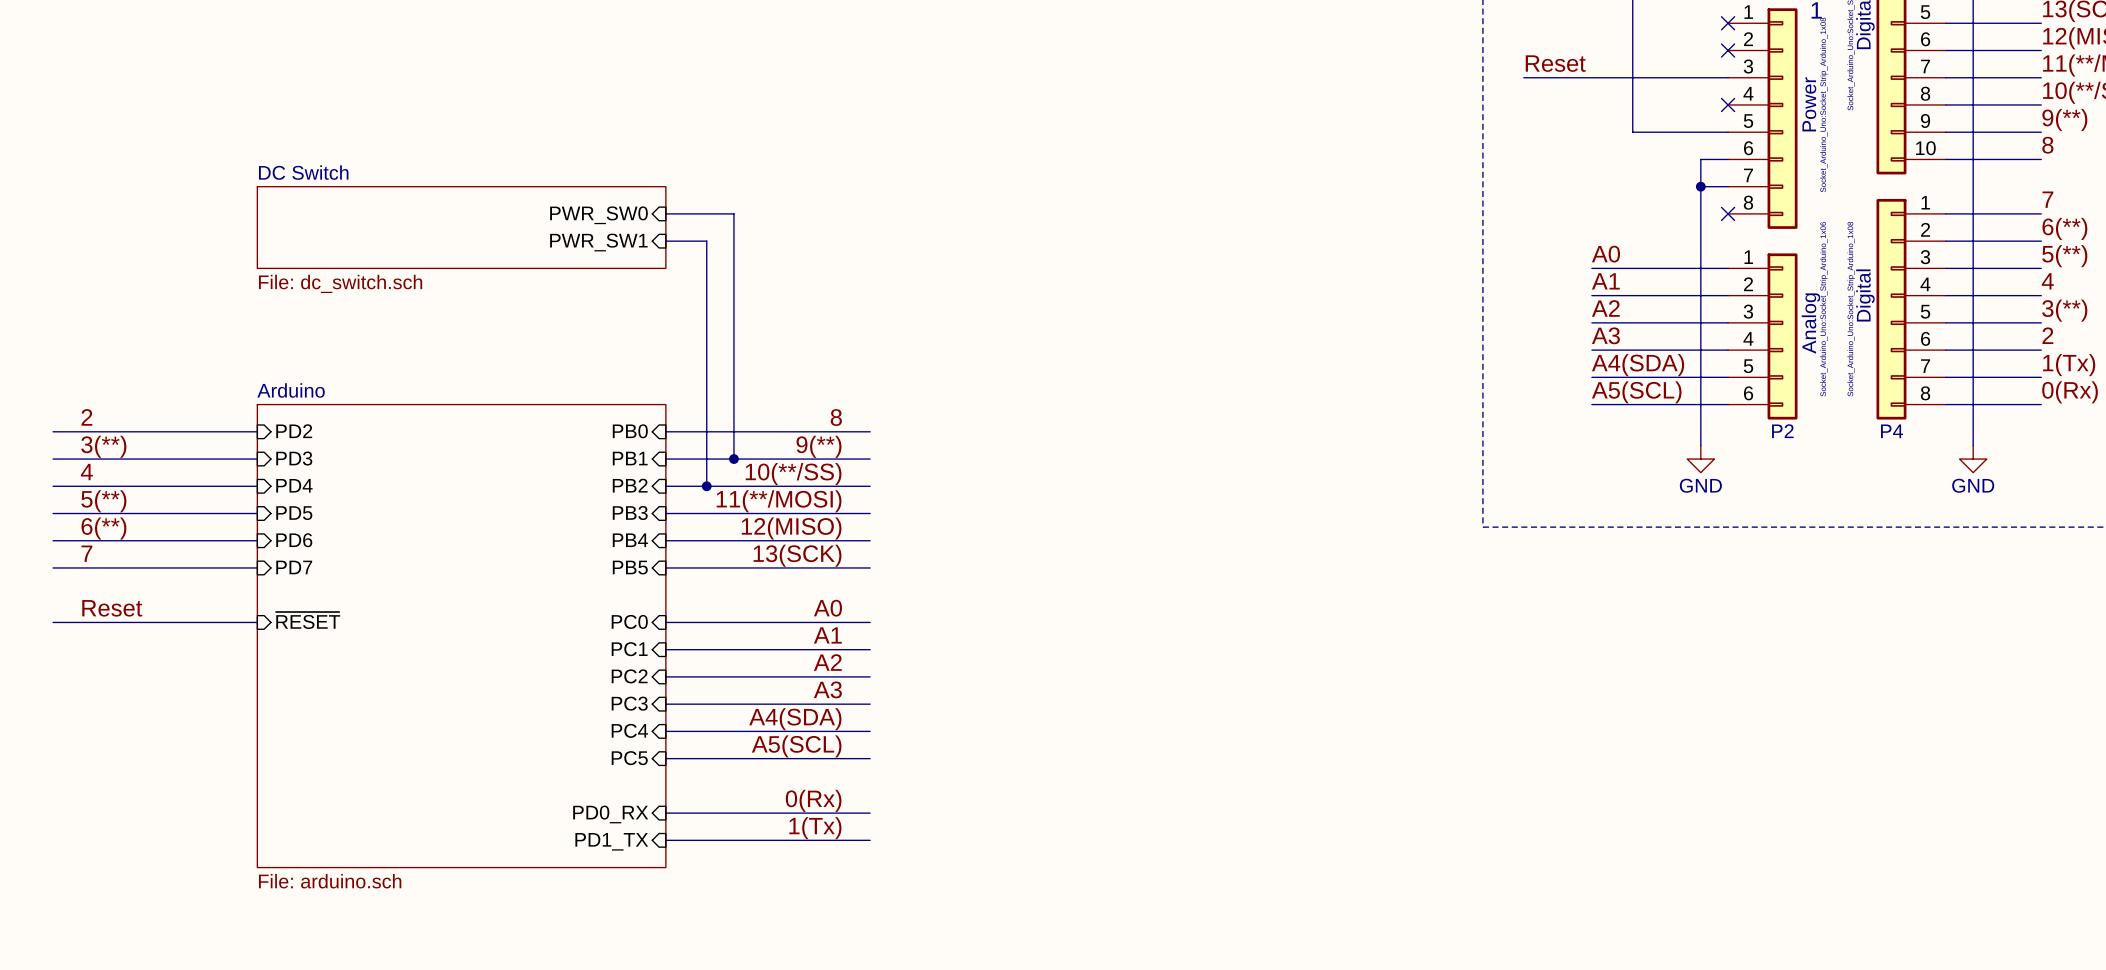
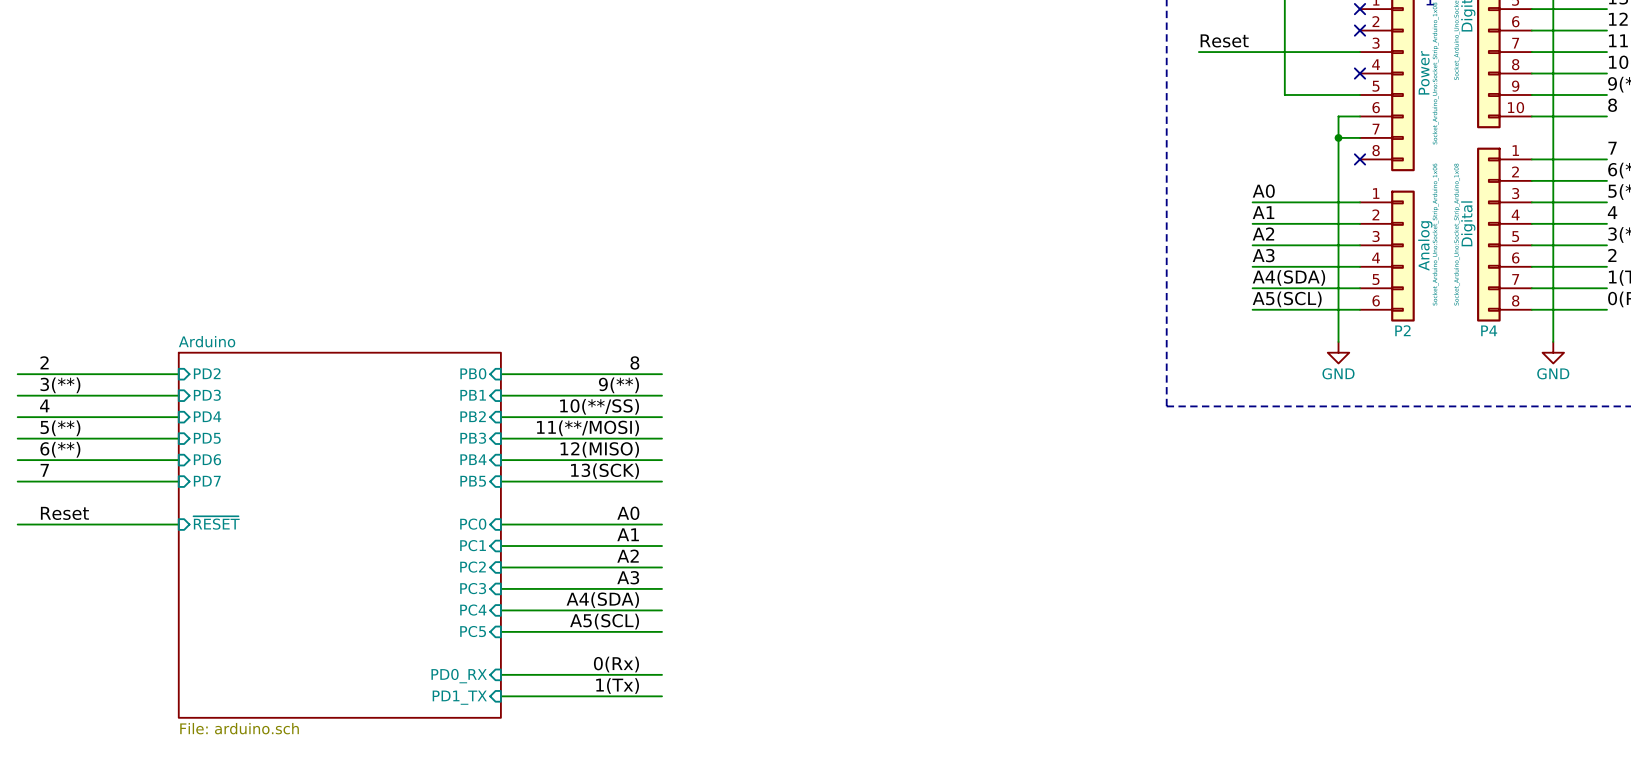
wire: (665, 213) (733, 213) (733, 459) -> none
sheet pin: PWR_SW0 (598, 215) -> none
sheet DC Switch: File: dc_switch.sch (461, 227) -> none
wire: (665, 241) (706, 241) (706, 486) -> none
sheet pin: PWR_SW1 (598, 242) -> none
label position: 2 (86, 417) -> 2 (44, 362)
label position: 8 (836, 417) -> 8 (634, 362)
wire: (53, 431) (257, 431) -> (17, 524) (178, 524)
sheet pin position: PD2 (294, 431) -> PD2 (207, 373)
sheet pin position: PB0 (630, 431) -> PB0 (473, 373)
wire: (665, 431) (870, 431) -> none
label position: 3(**) (103, 446) -> 3(**) (60, 385)
label position: 9(**) (818, 446) -> 9(**) (618, 385)
sheet pin position: PD3 (294, 458) -> PD3 (207, 395)
sheet pin position: PB1 (630, 458) -> PB1 (473, 395)
wire: (53, 459) (257, 459) -> (17, 460) (178, 460)
wire: (665, 459) (870, 459) -> (500, 460) (662, 460)
junction: (733, 459) -> none
label position: 4 (86, 472) -> 4 (44, 405)
label position: 10(**/SS) (793, 474) -> 10(**/SS) (599, 406)
sheet pin position: PD4 (294, 485) -> PD4 (207, 416)
sheet pin position: PB2 (630, 485) -> PB2 (473, 416)
wire: (230, 486) (257, 486) -> (17, 374) (39, 374)
junction: (706, 486) -> none
wire: (842, 486) (870, 486) -> (500, 374) (522, 374)
label position: 5(**) (103, 501) -> 5(**) (60, 428)
label position: 11(**/MOSI) (779, 501) -> 11(**/MOSI) (587, 428)
wire: (230, 513) (257, 513) -> (17, 395) (39, 395)
sheet pin position: PD5 (294, 513) -> PD5 (207, 438)
sheet pin position: PB3 (630, 513) -> PB3 (473, 438)
wire: (842, 513) (870, 513) -> (500, 395) (522, 395)
label position: 6(**) (103, 528) -> 6(**) (60, 449)
label position: 12(MISO) (791, 528) -> 12(MISO) (599, 449)
wire: (230, 540) (257, 540) -> (17, 417) (39, 417)
sheet pin position: PD6 (294, 540) -> PD6 (207, 459)
sheet pin position: PB4 (630, 540) -> PB4 (473, 459)
wire: (842, 540) (870, 540) -> (500, 417) (522, 417)
label position: 7 (86, 553) -> 7 (44, 470)
label position: 13(SCK) (797, 555) -> 13(SCK) (605, 471)
wire: (230, 567) (257, 567) -> (17, 438) (39, 438)
sheet pin position: PD7 (294, 567) -> PD7 (207, 481)
sheet pin position: PB5 (630, 567) -> PB5 (473, 481)
wire: (842, 567) (870, 567) -> (500, 438) (522, 438)
label position: Reset (112, 608) -> Reset (64, 513)
label position: A0 (827, 608) -> A0 (628, 513)
sheet pin position: ~{RESET} (308, 620) -> ~{RESET} (216, 522)
sheet pin position: PC0 (629, 621) -> PC0 (473, 524)
wire: (230, 622) (257, 622) -> (17, 481) (39, 481)
wire: (842, 622) (870, 622) -> (500, 481) (522, 481)
label position: A1 (827, 635) -> A1 (628, 534)
sheet Arduino position: (461, 636) -> (339, 535)
sheet pin position: PC1 (629, 649) -> PC1 (473, 545)
wire: (665, 649) (870, 649) -> (500, 610) (662, 610)
label position: A2 (827, 662) -> A2 (628, 556)
sheet pin position: PC2 (629, 676) -> PC2 (473, 567)
wire: (842, 676) (870, 676) -> (500, 524) (522, 524)
label position: A3 (827, 689) -> A3 (628, 577)
sheet pin position: PC3 (629, 703) -> PC3 (473, 588)
wire: (842, 704) (870, 704) -> (500, 546) (522, 546)
label position: A4(SDA) (795, 719) -> A4(SDA) (602, 600)
sheet pin position: PC4 (629, 730) -> PC4 (473, 610)
wire: (842, 731) (870, 731) -> (500, 567) (522, 567)
label position: A5(SCL) (796, 746) -> A5(SCL) (604, 621)
sheet pin position: PC5 (629, 758) -> PC5 (473, 631)
wire: (842, 758) (870, 758) -> (500, 588) (522, 588)
label position: 0(Rx) (813, 800) -> 0(Rx) (616, 664)
wire: (842, 813) (870, 813) -> (500, 631) (522, 631)
sheet pin position: PD0_RX (610, 814) -> PD0_RX (459, 676)
label position: 1(Tx) (815, 828) -> 1(Tx) (617, 686)
wire: (665, 840) (870, 840) -> (500, 674) (662, 674)
sheet pin position: PD1_TX (611, 841) -> PD1_TX (459, 697)
wire: none -> (500, 696) (662, 696)

